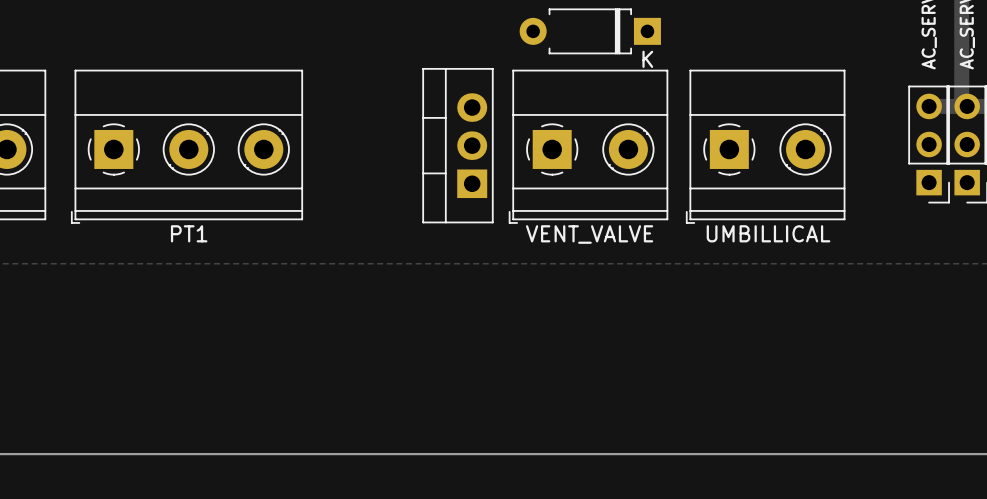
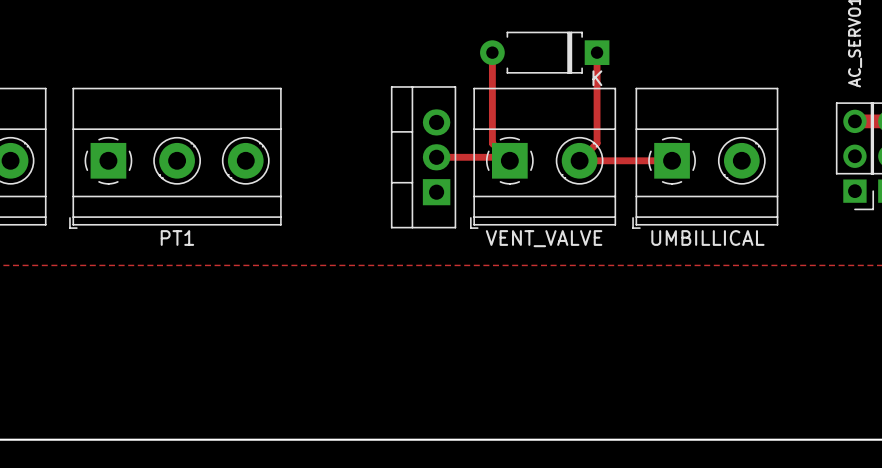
track: none -> (492, 52) (492, 143) (509, 160)
track: none -> (597, 52) (597, 143) (579, 160) (672, 160)
track: none -> (436, 157) (506, 157)

